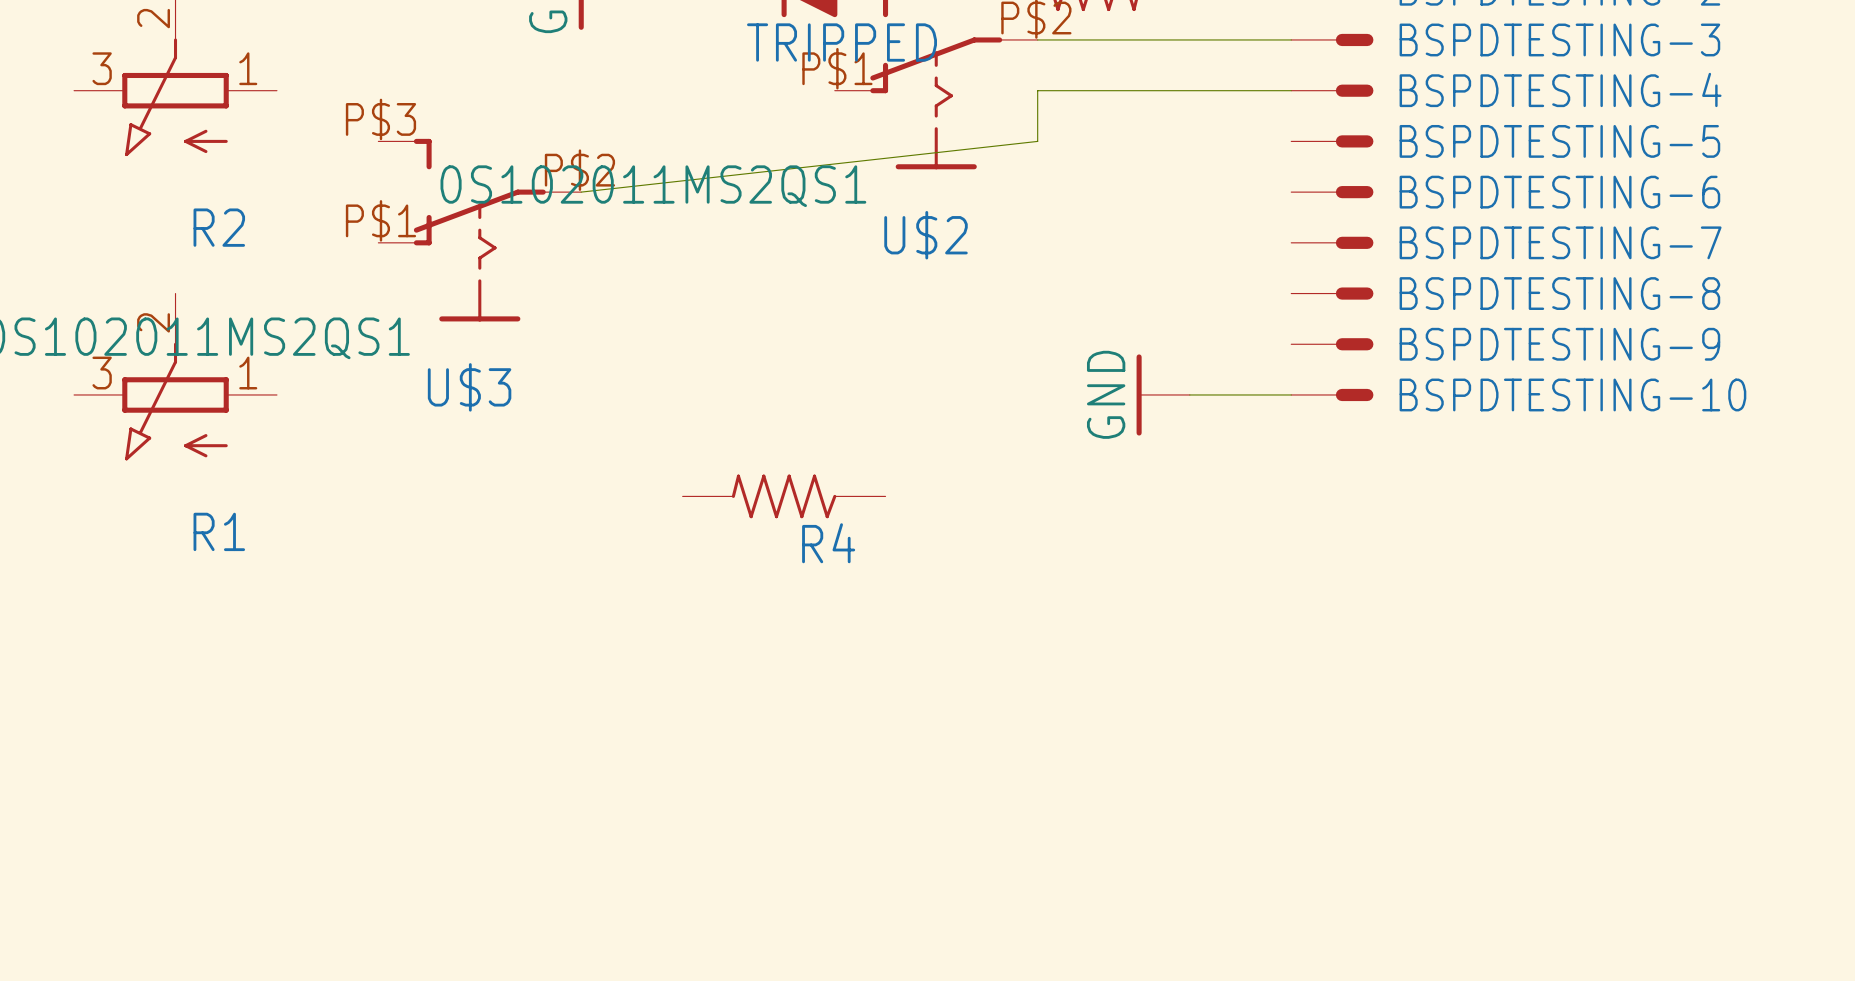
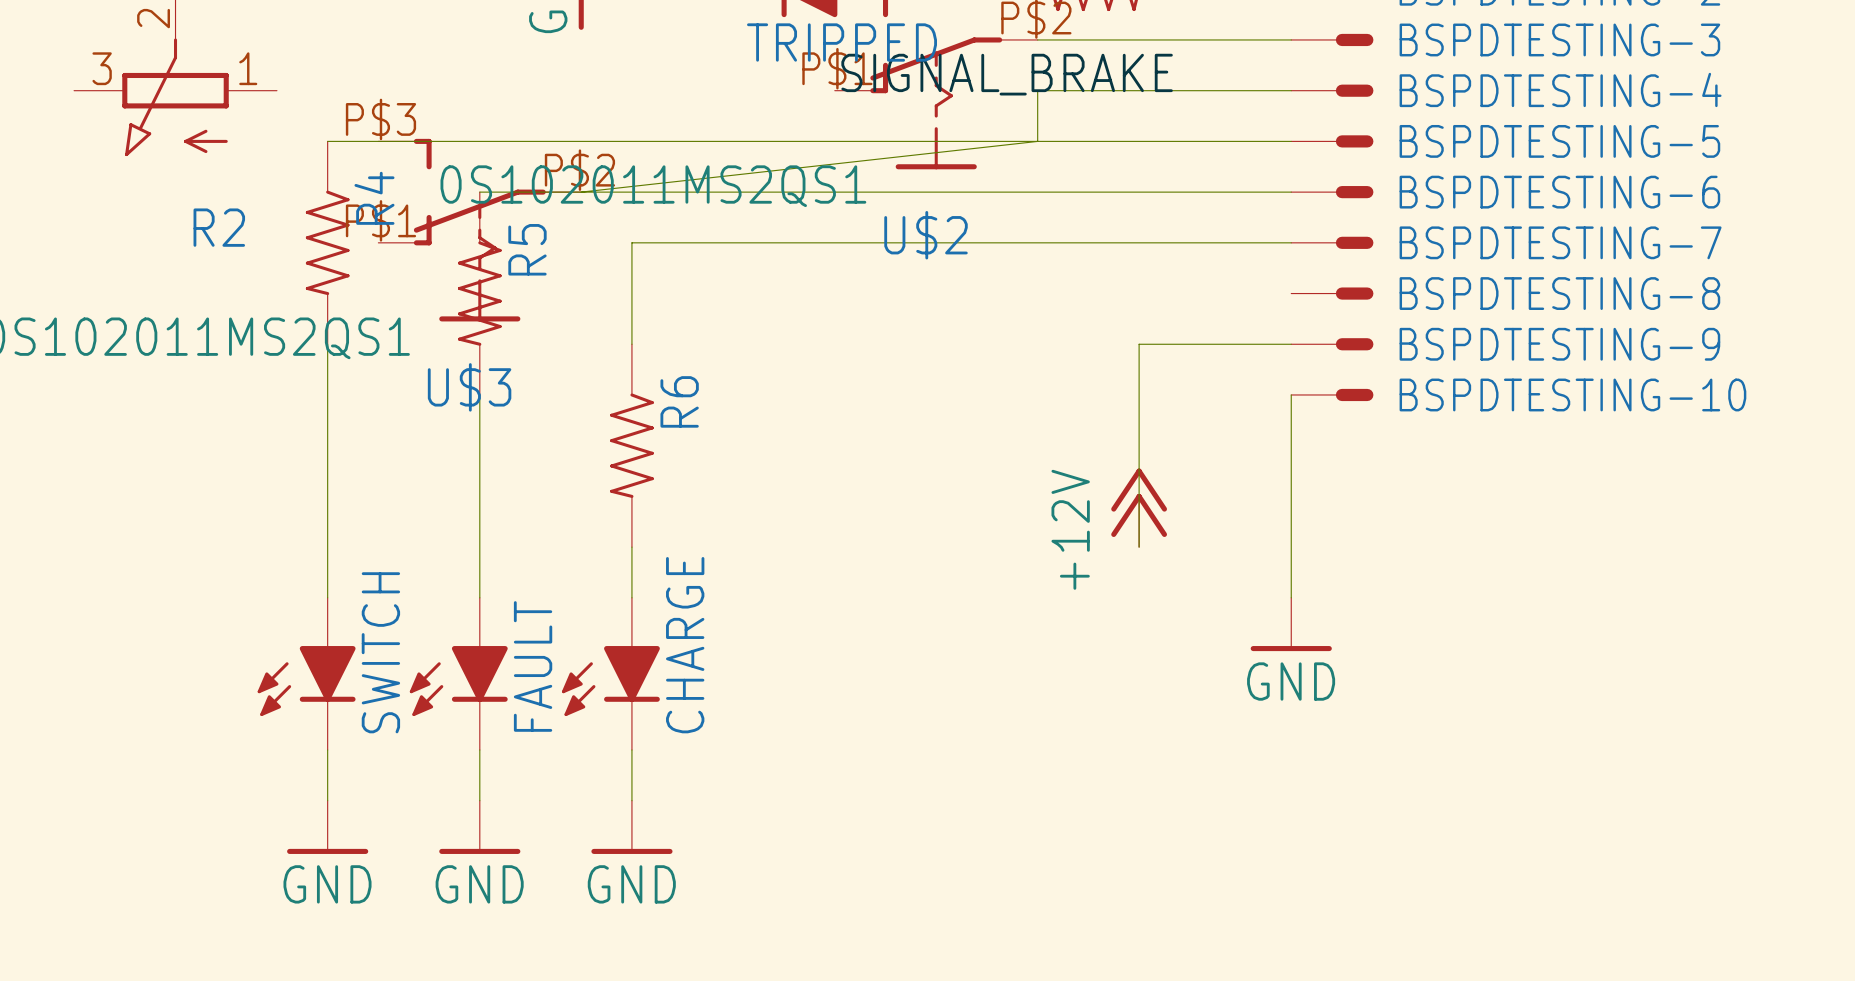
label: none -> SIGNAL_BRAKE (1007, 74)
wire: none -> (327, 141) (1291, 141)
wire: none -> (479, 192) (1291, 192)
wire: none -> (1291, 242) (631, 242) (631, 344)
R5: none -> (479, 293)
wire: none -> (327, 344) (327, 597)
wire: none -> (1291, 344) (1139, 344) (1139, 547)
R1: (175, 376) -> none
wire: none -> (479, 394) (479, 597)
power symbol rotation: 0° (1139, 394) -> 90° counterclockwise (1291, 648)
power symbol position: GND (1163, 394) -> GND (1291, 624)
wire: (1189, 394) (1291, 394) -> (1291, 597) (1291, 394)
R6: none -> (631, 445)
R4 rotation: 0° (784, 496) -> 90° counterclockwise (327, 242)
R4 position: (784, 496) -> (327, 242)
power symbol: none -> +12V (1139, 507)
wire: none -> (631, 547) (631, 597)
SWITCH: none -> (306, 673)
FAULT: none -> (458, 673)
CHARGE: none -> (610, 673)
wire: none -> (327, 749) (327, 800)
wire: none -> (479, 749) (479, 800)
wire: none -> (631, 749) (631, 800)
power symbol: none -> GND (327, 827)
power symbol: none -> GND (479, 827)
power symbol: none -> GND (631, 827)

